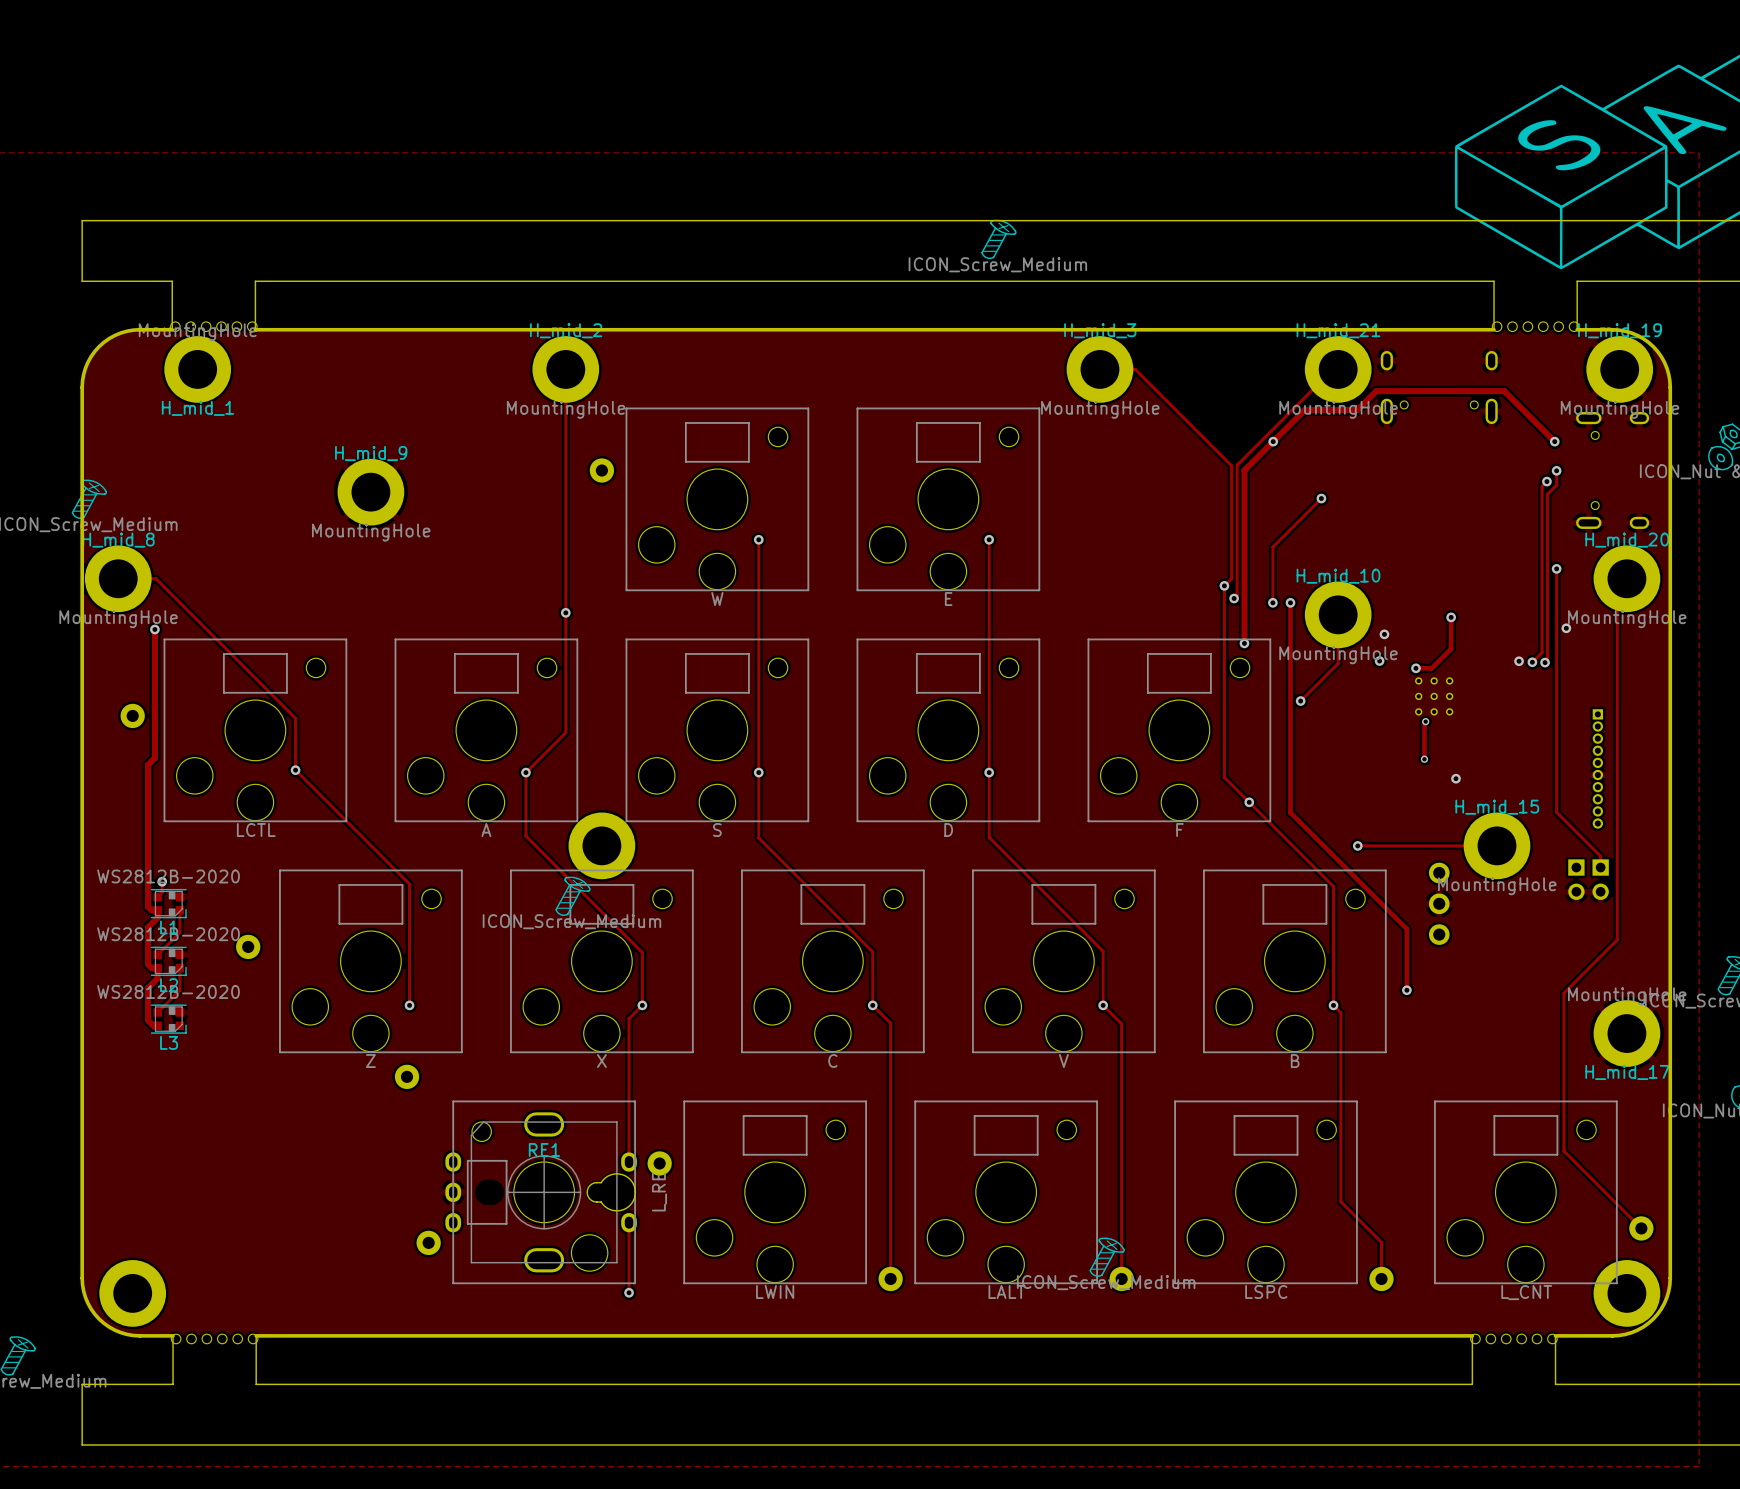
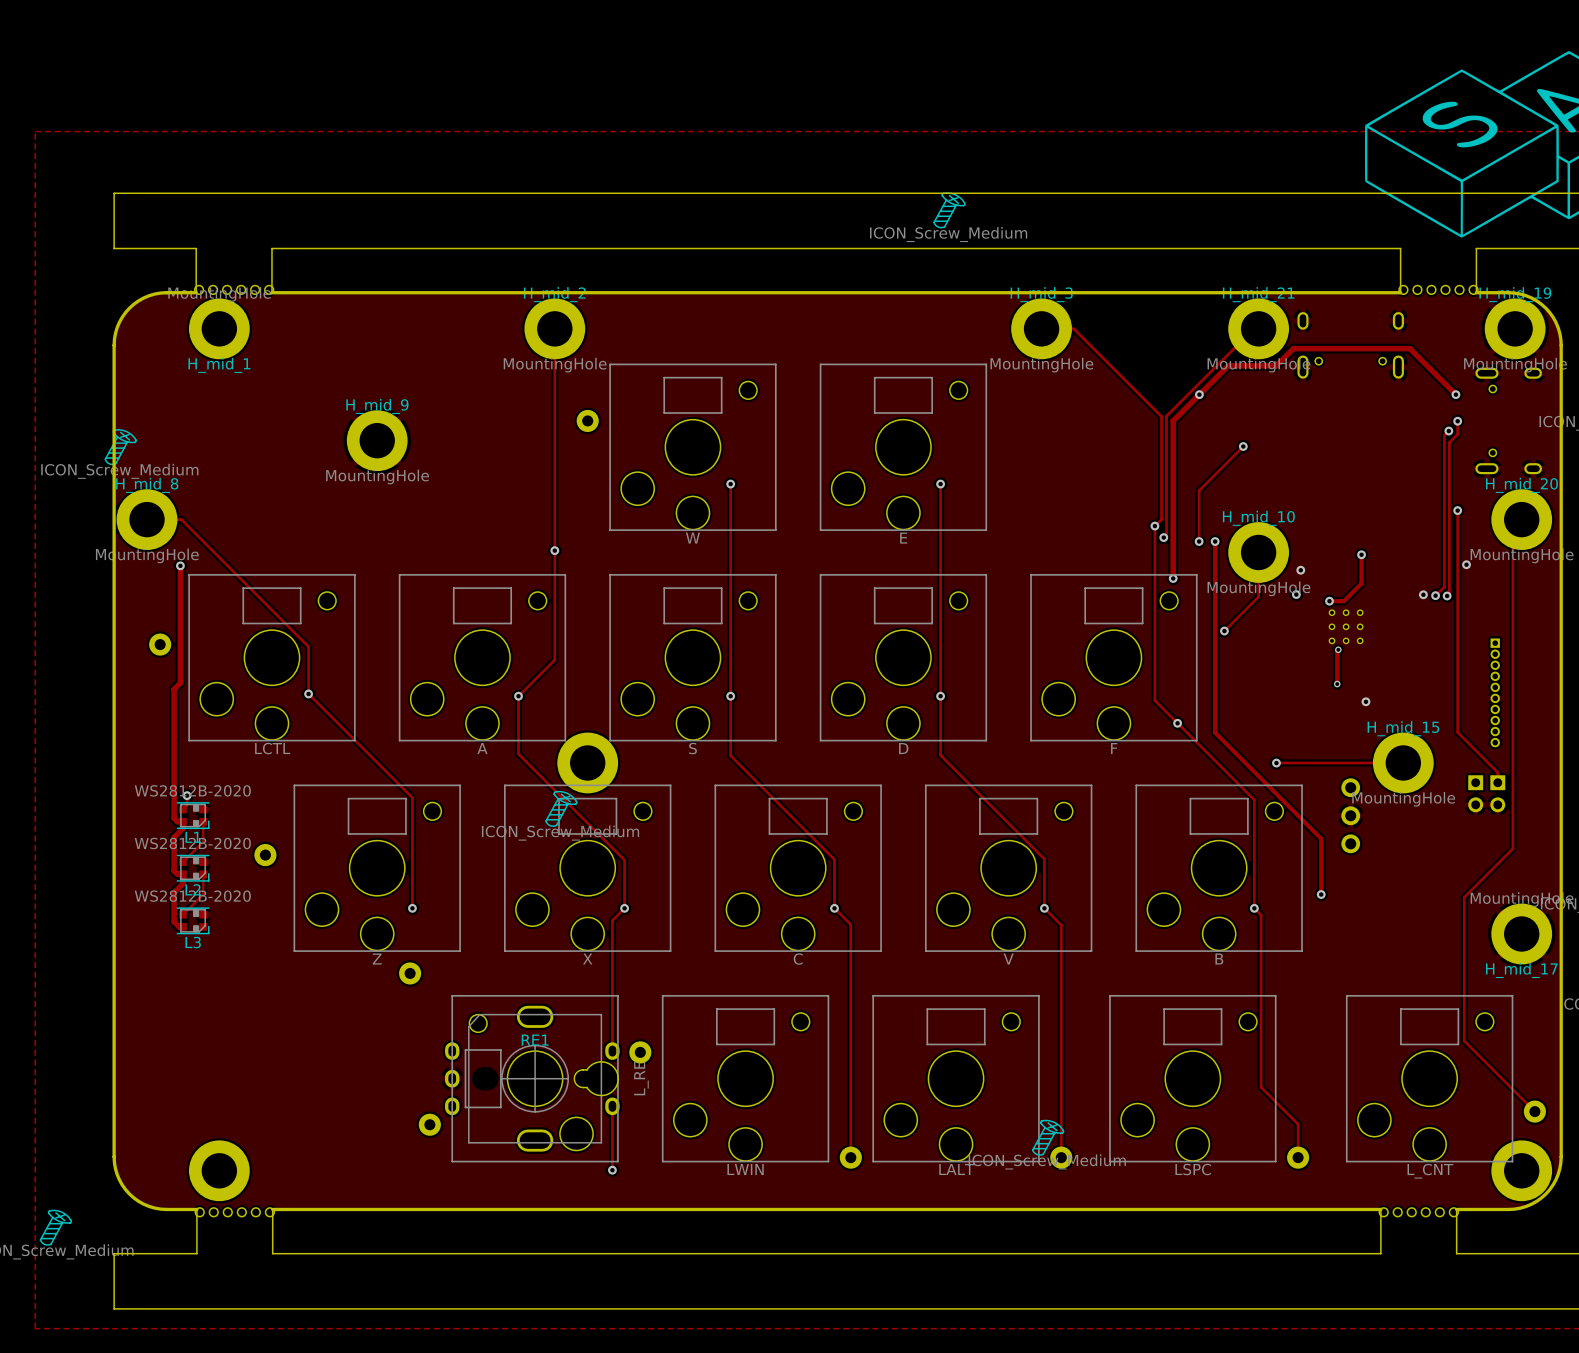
part position: (132, 1293) -> (219, 1170)

